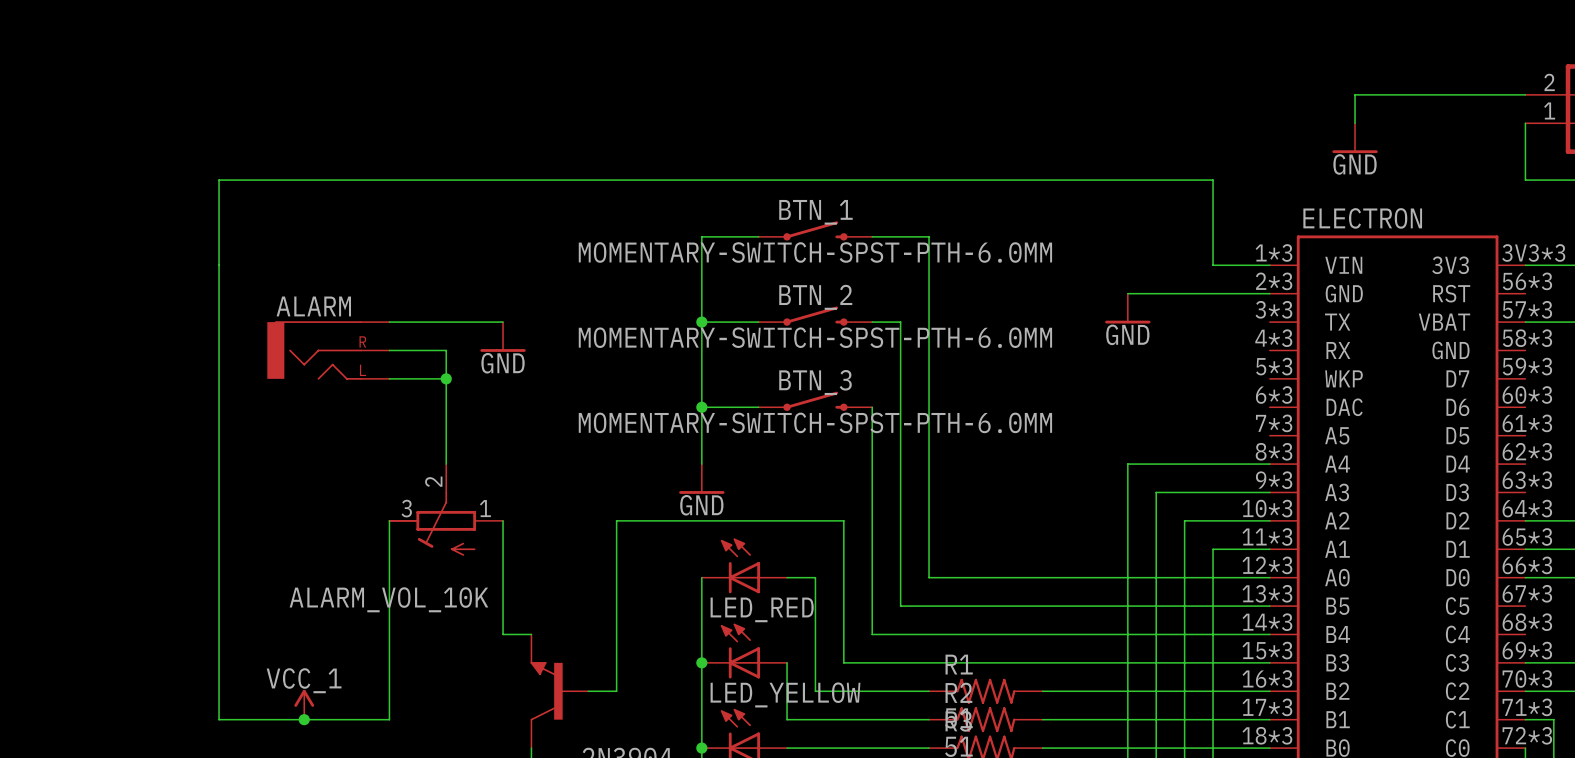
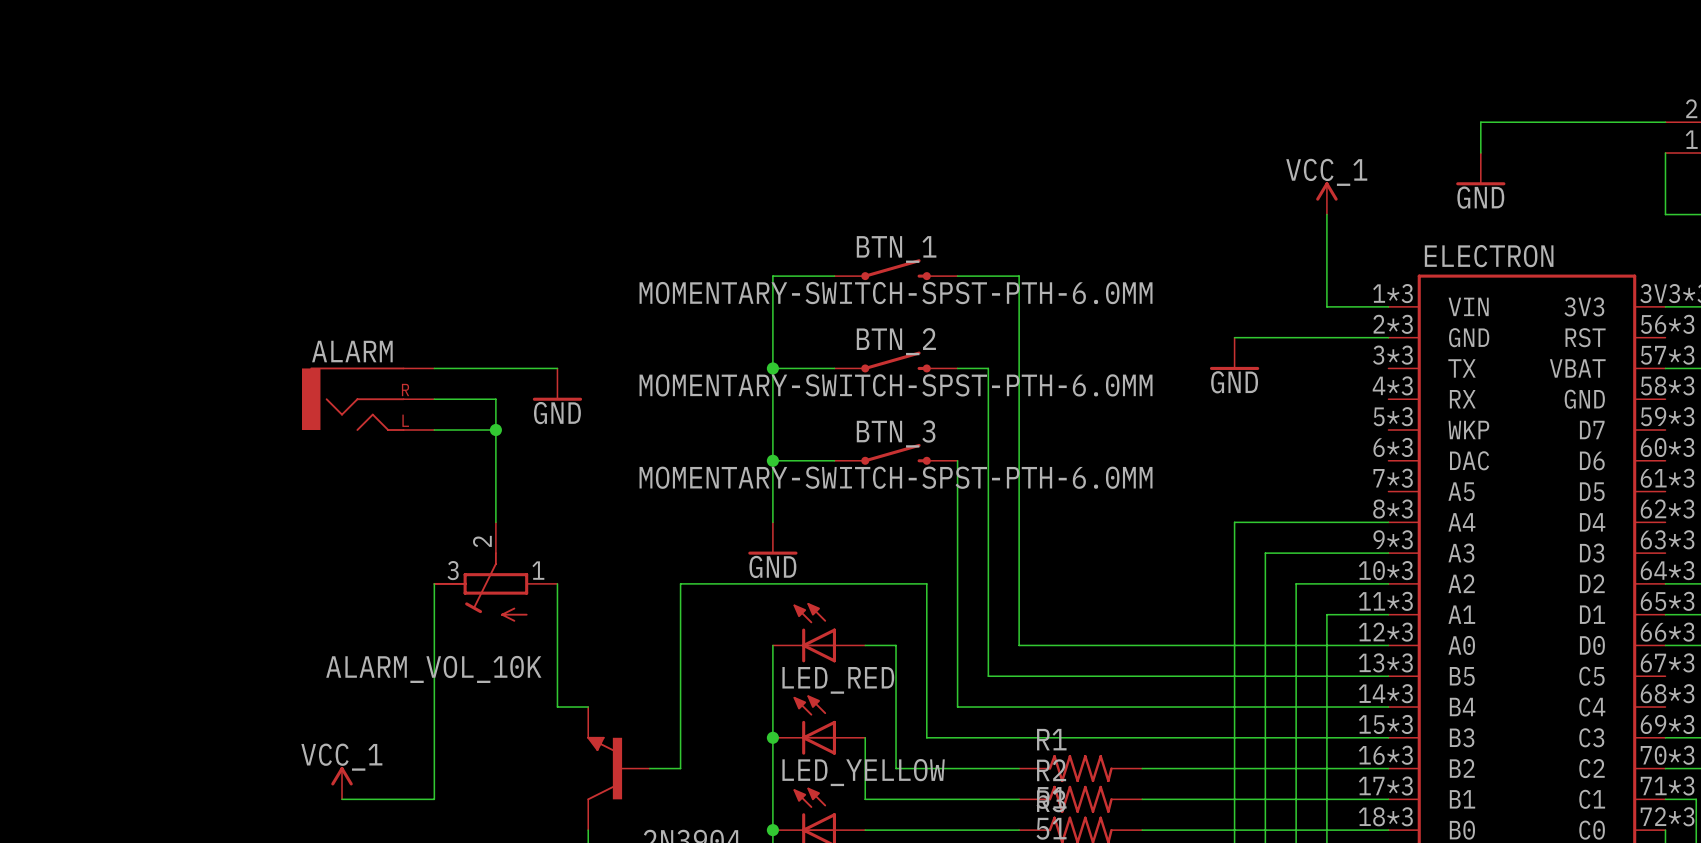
power symbol: none -> VCC_1 (1326, 198)
wire: (1213, 180) (219, 180) (219, 719) (304, 719) -> none
junction: (304, 719) -> none

